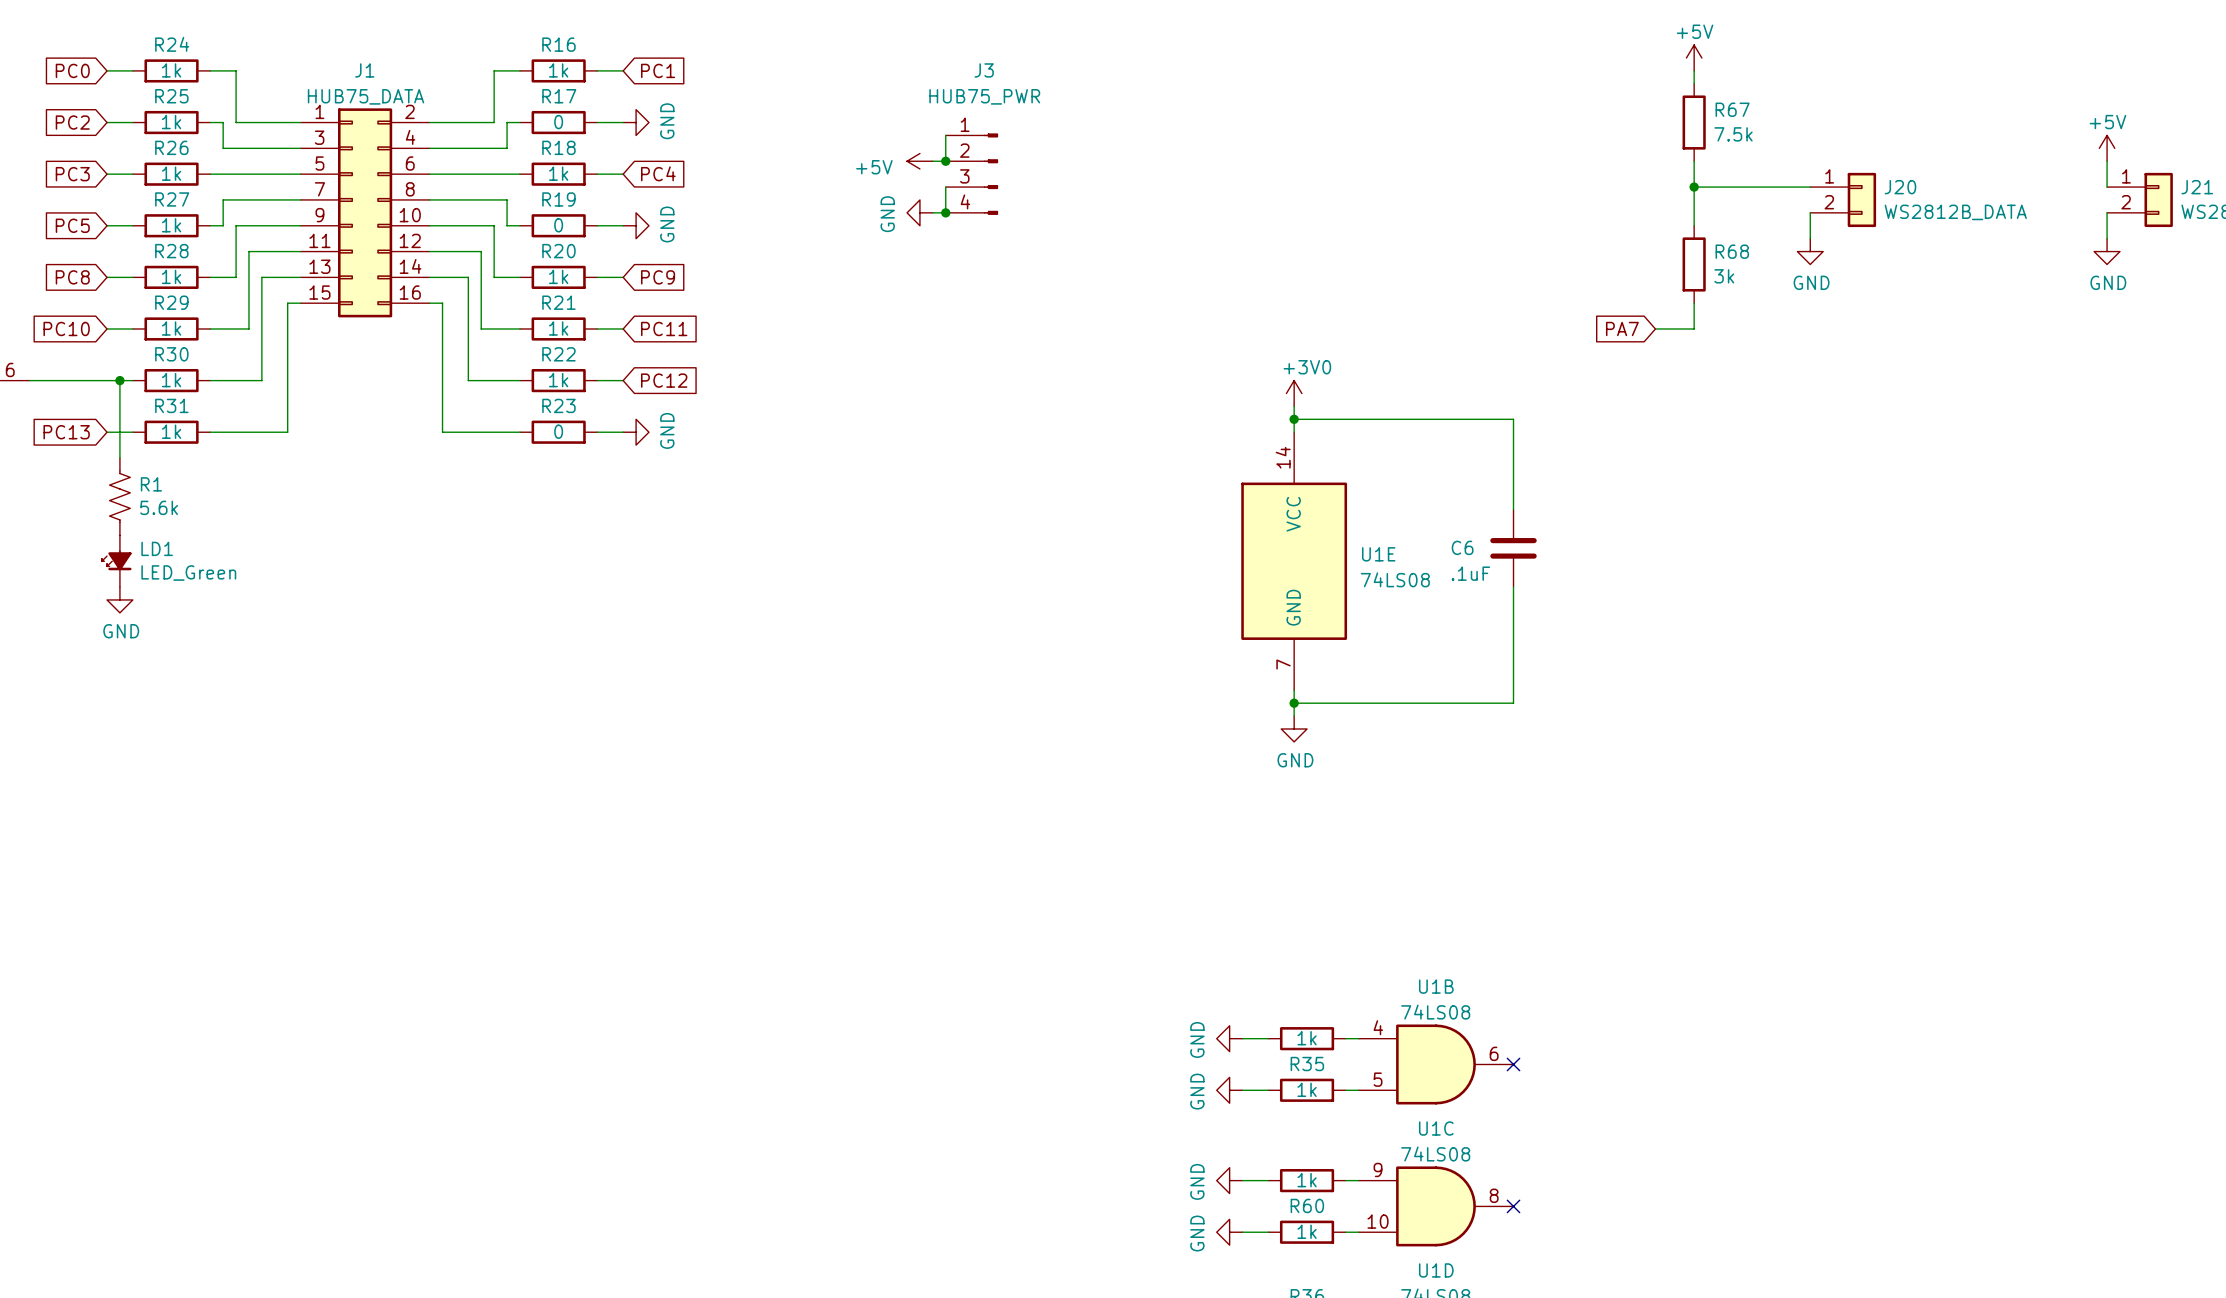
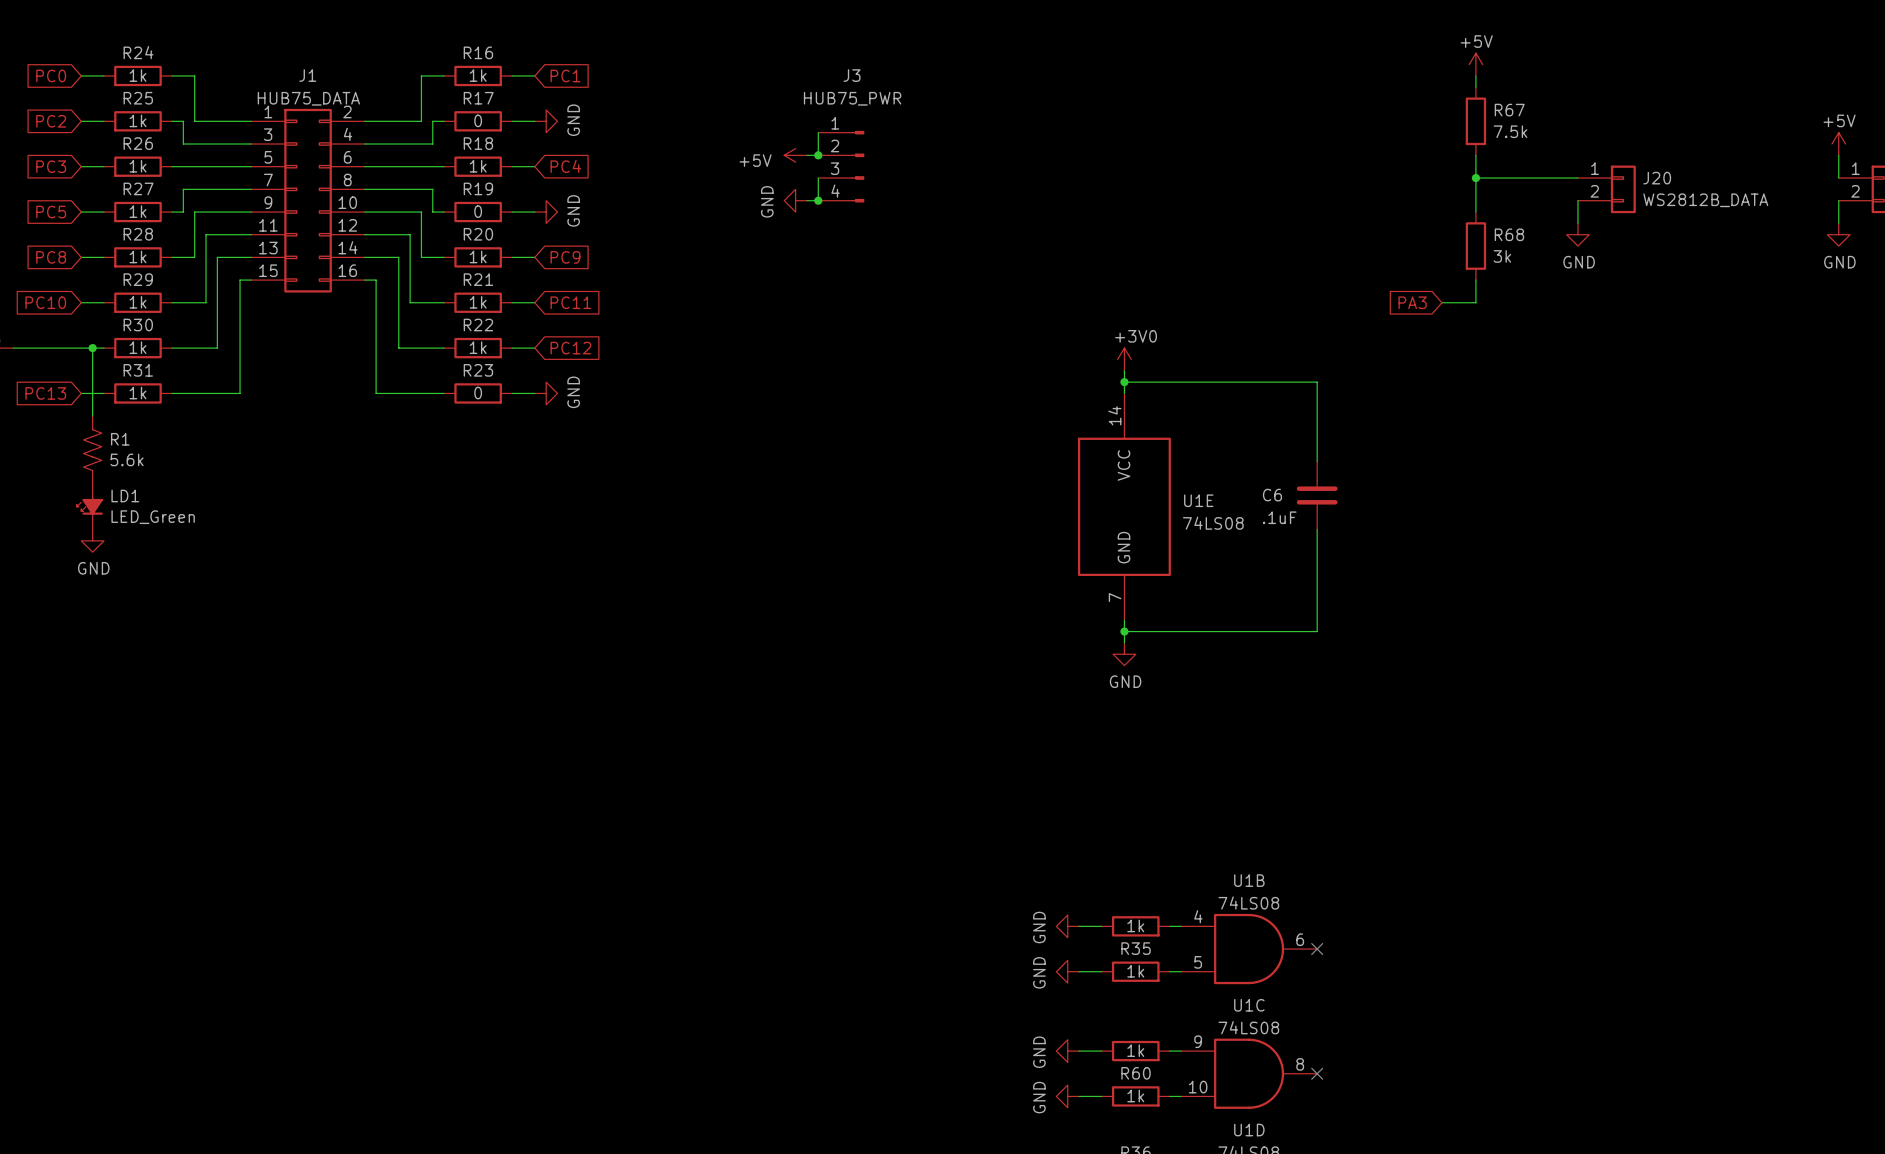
global label: PA7 (1622, 328) -> PA3 (1412, 302)

